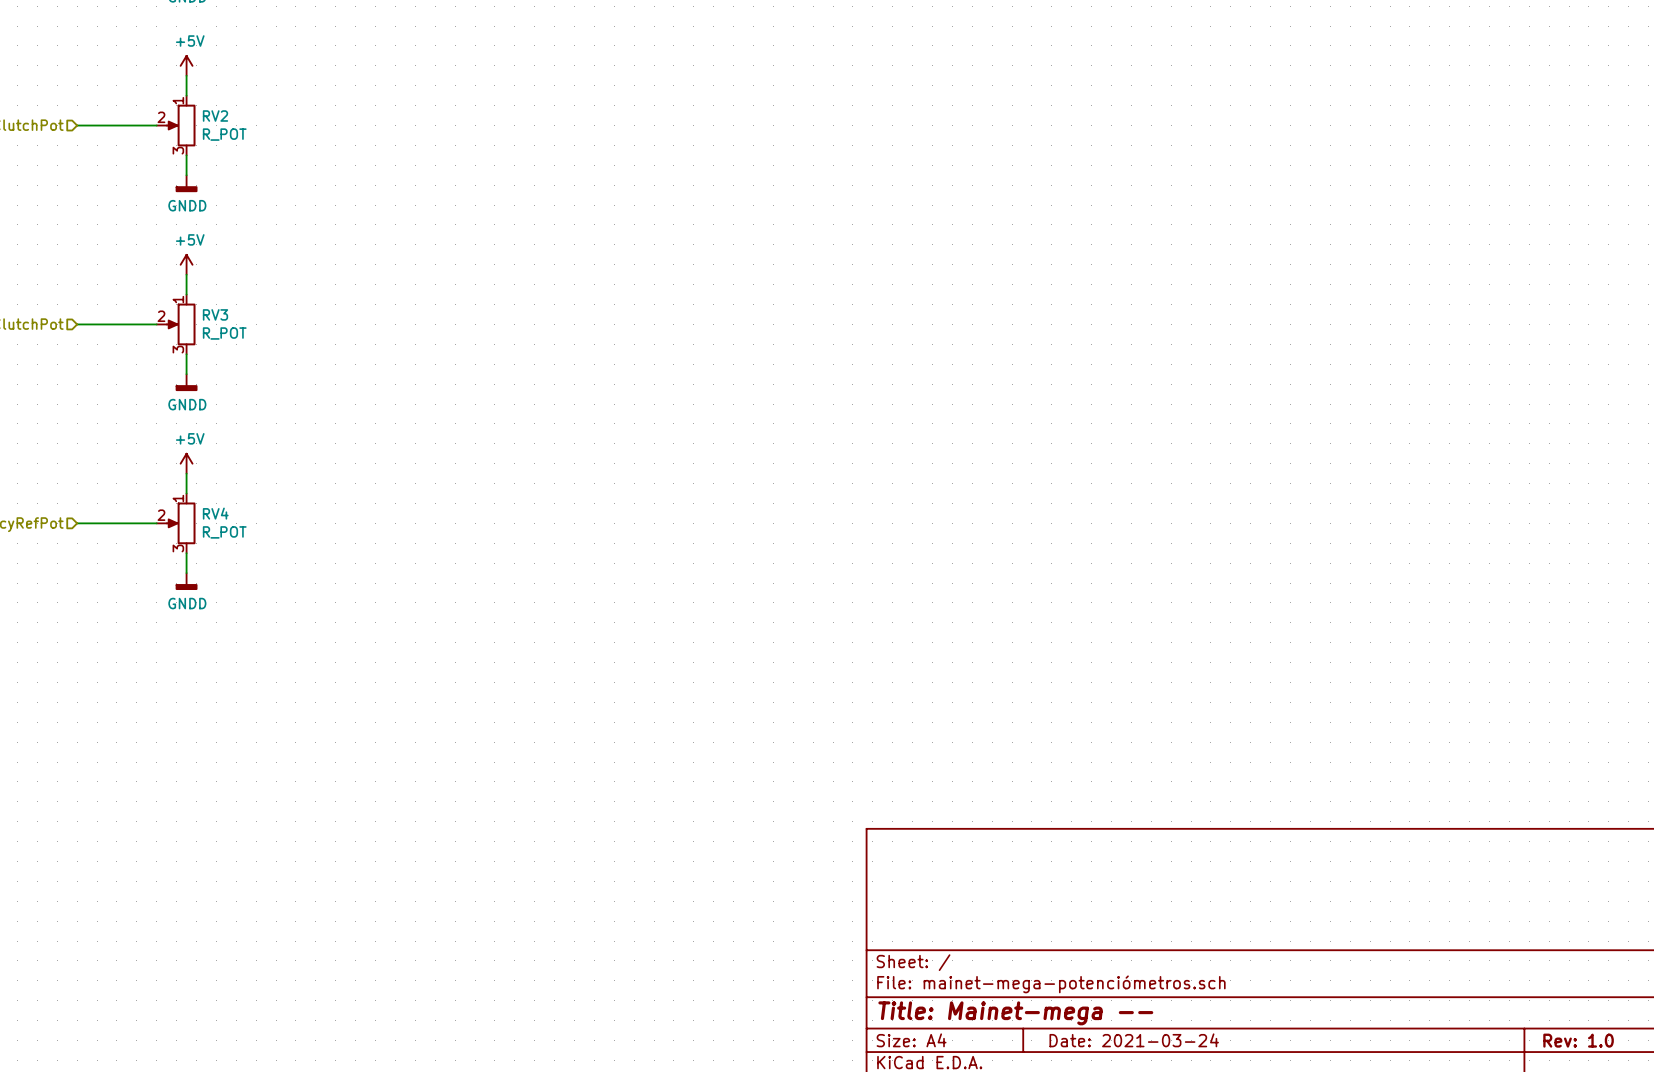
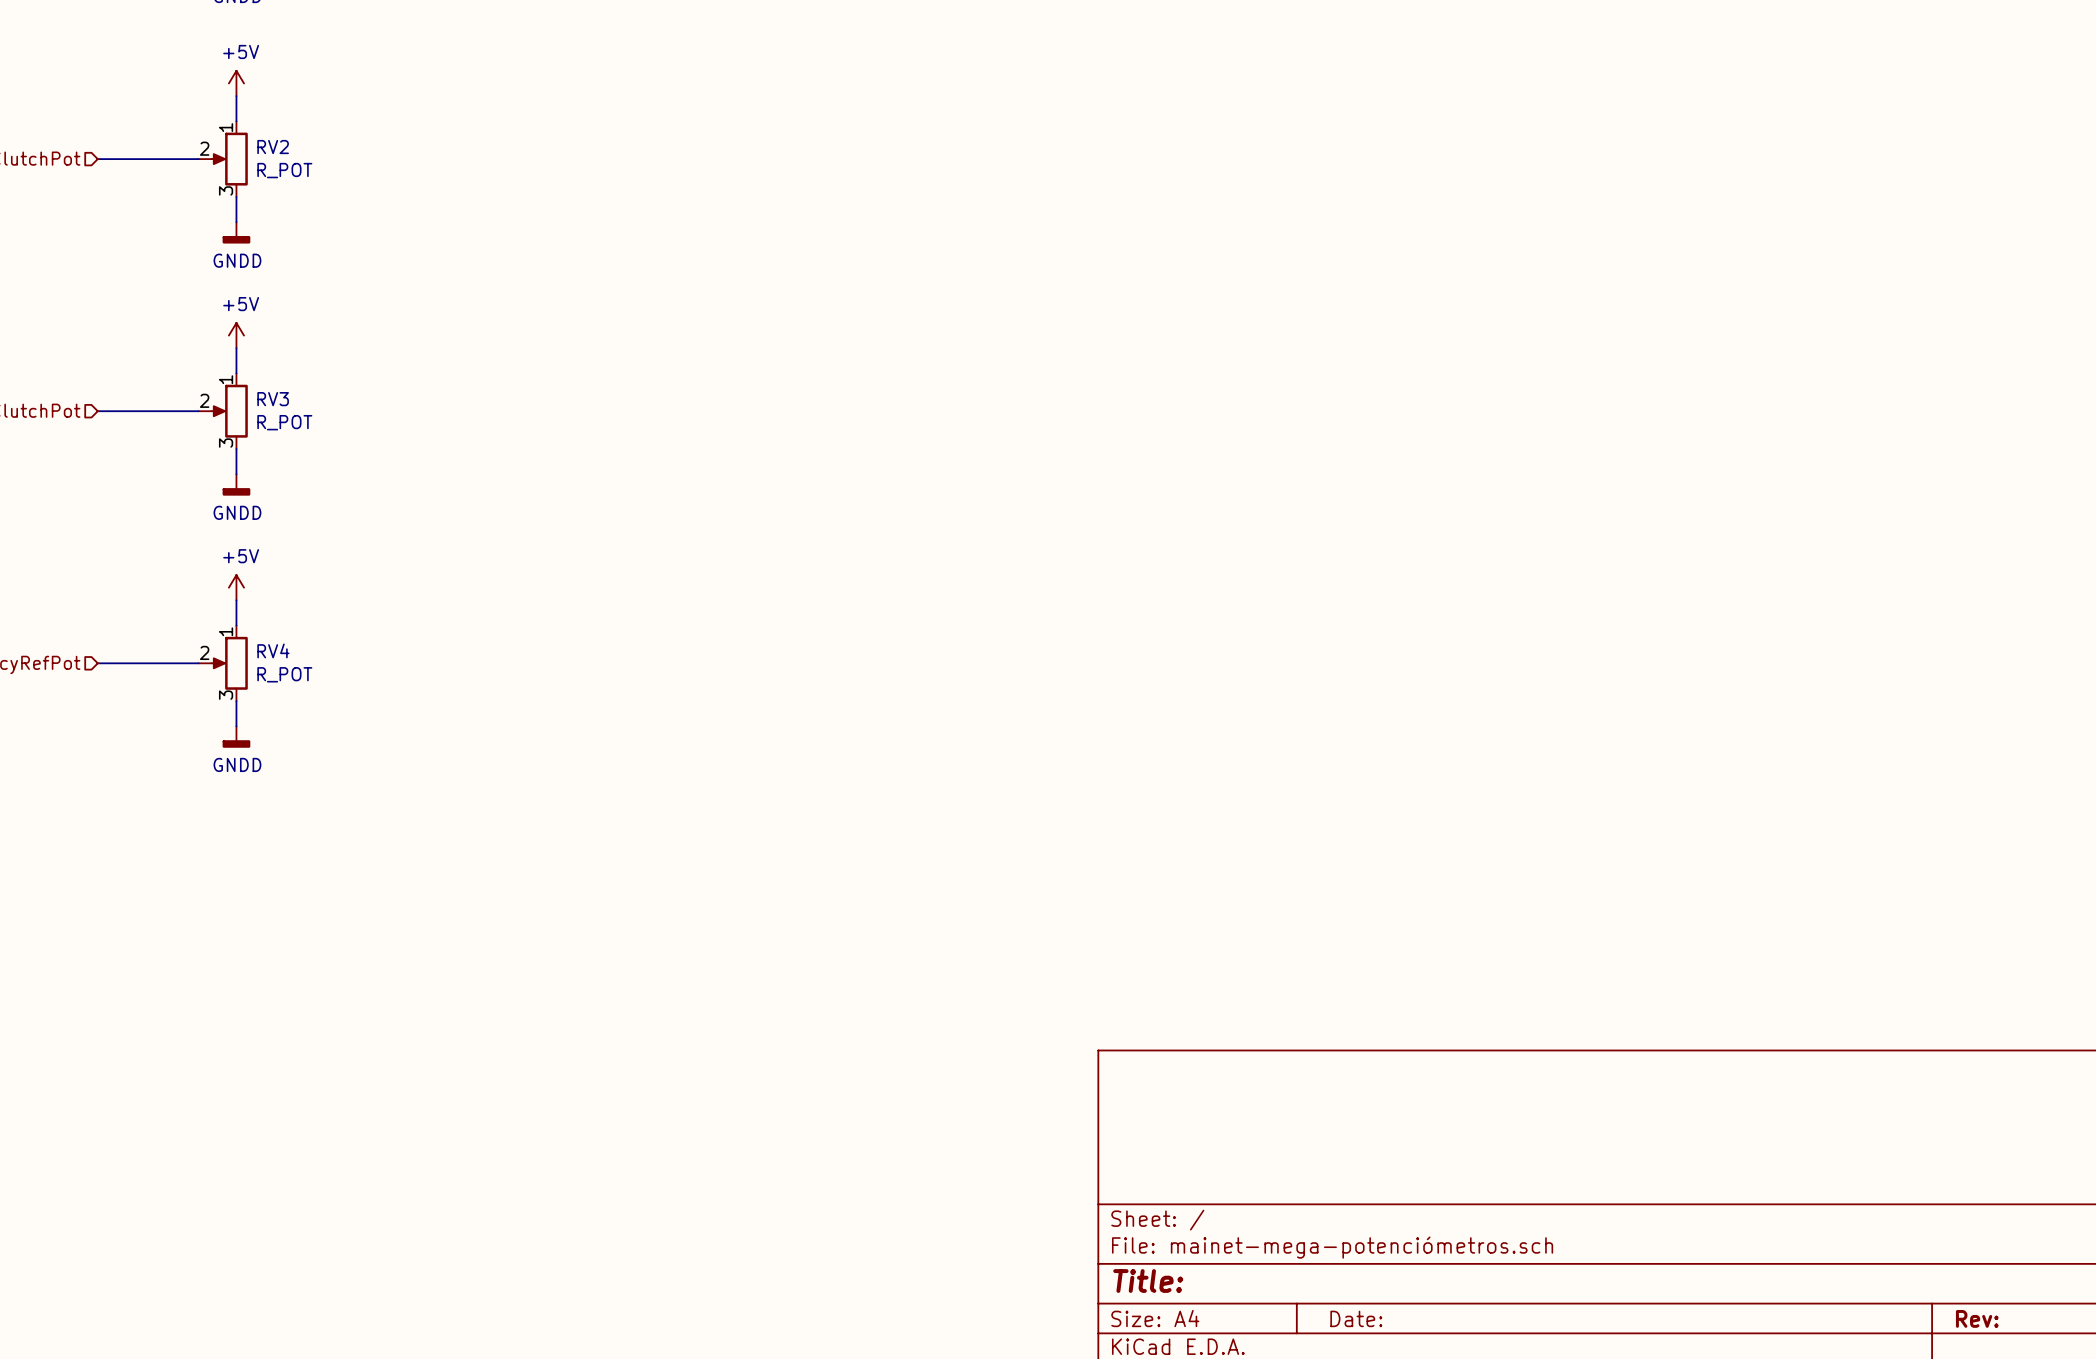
title block: Title: Mainet-mega -- (1015, 1013) -> Title: (1148, 1281)
title block: Date: 2021-03-24 (1134, 1040) -> Date: (1356, 1318)
title block: Rev: 1.0 (1578, 1040) -> Rev: (1977, 1318)

